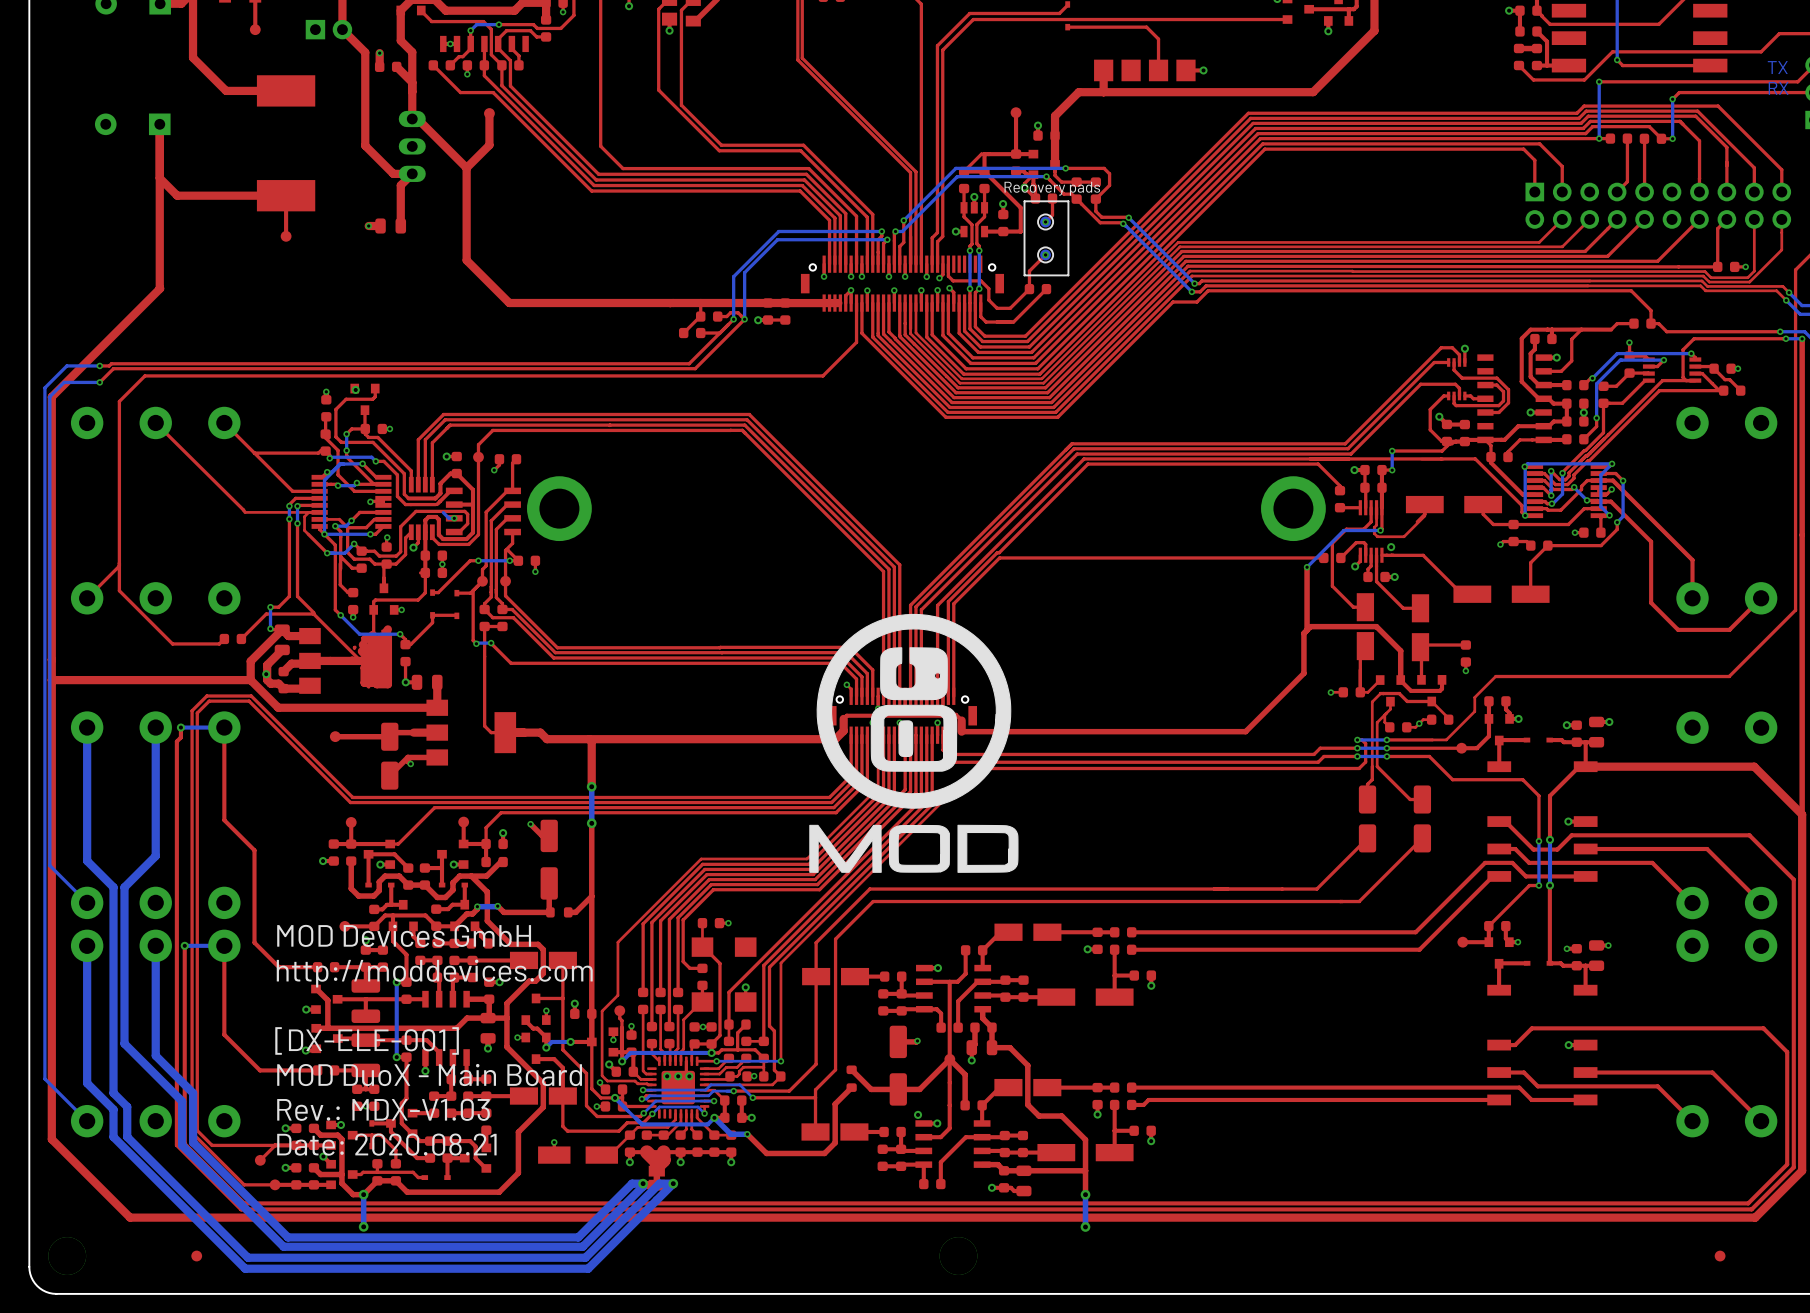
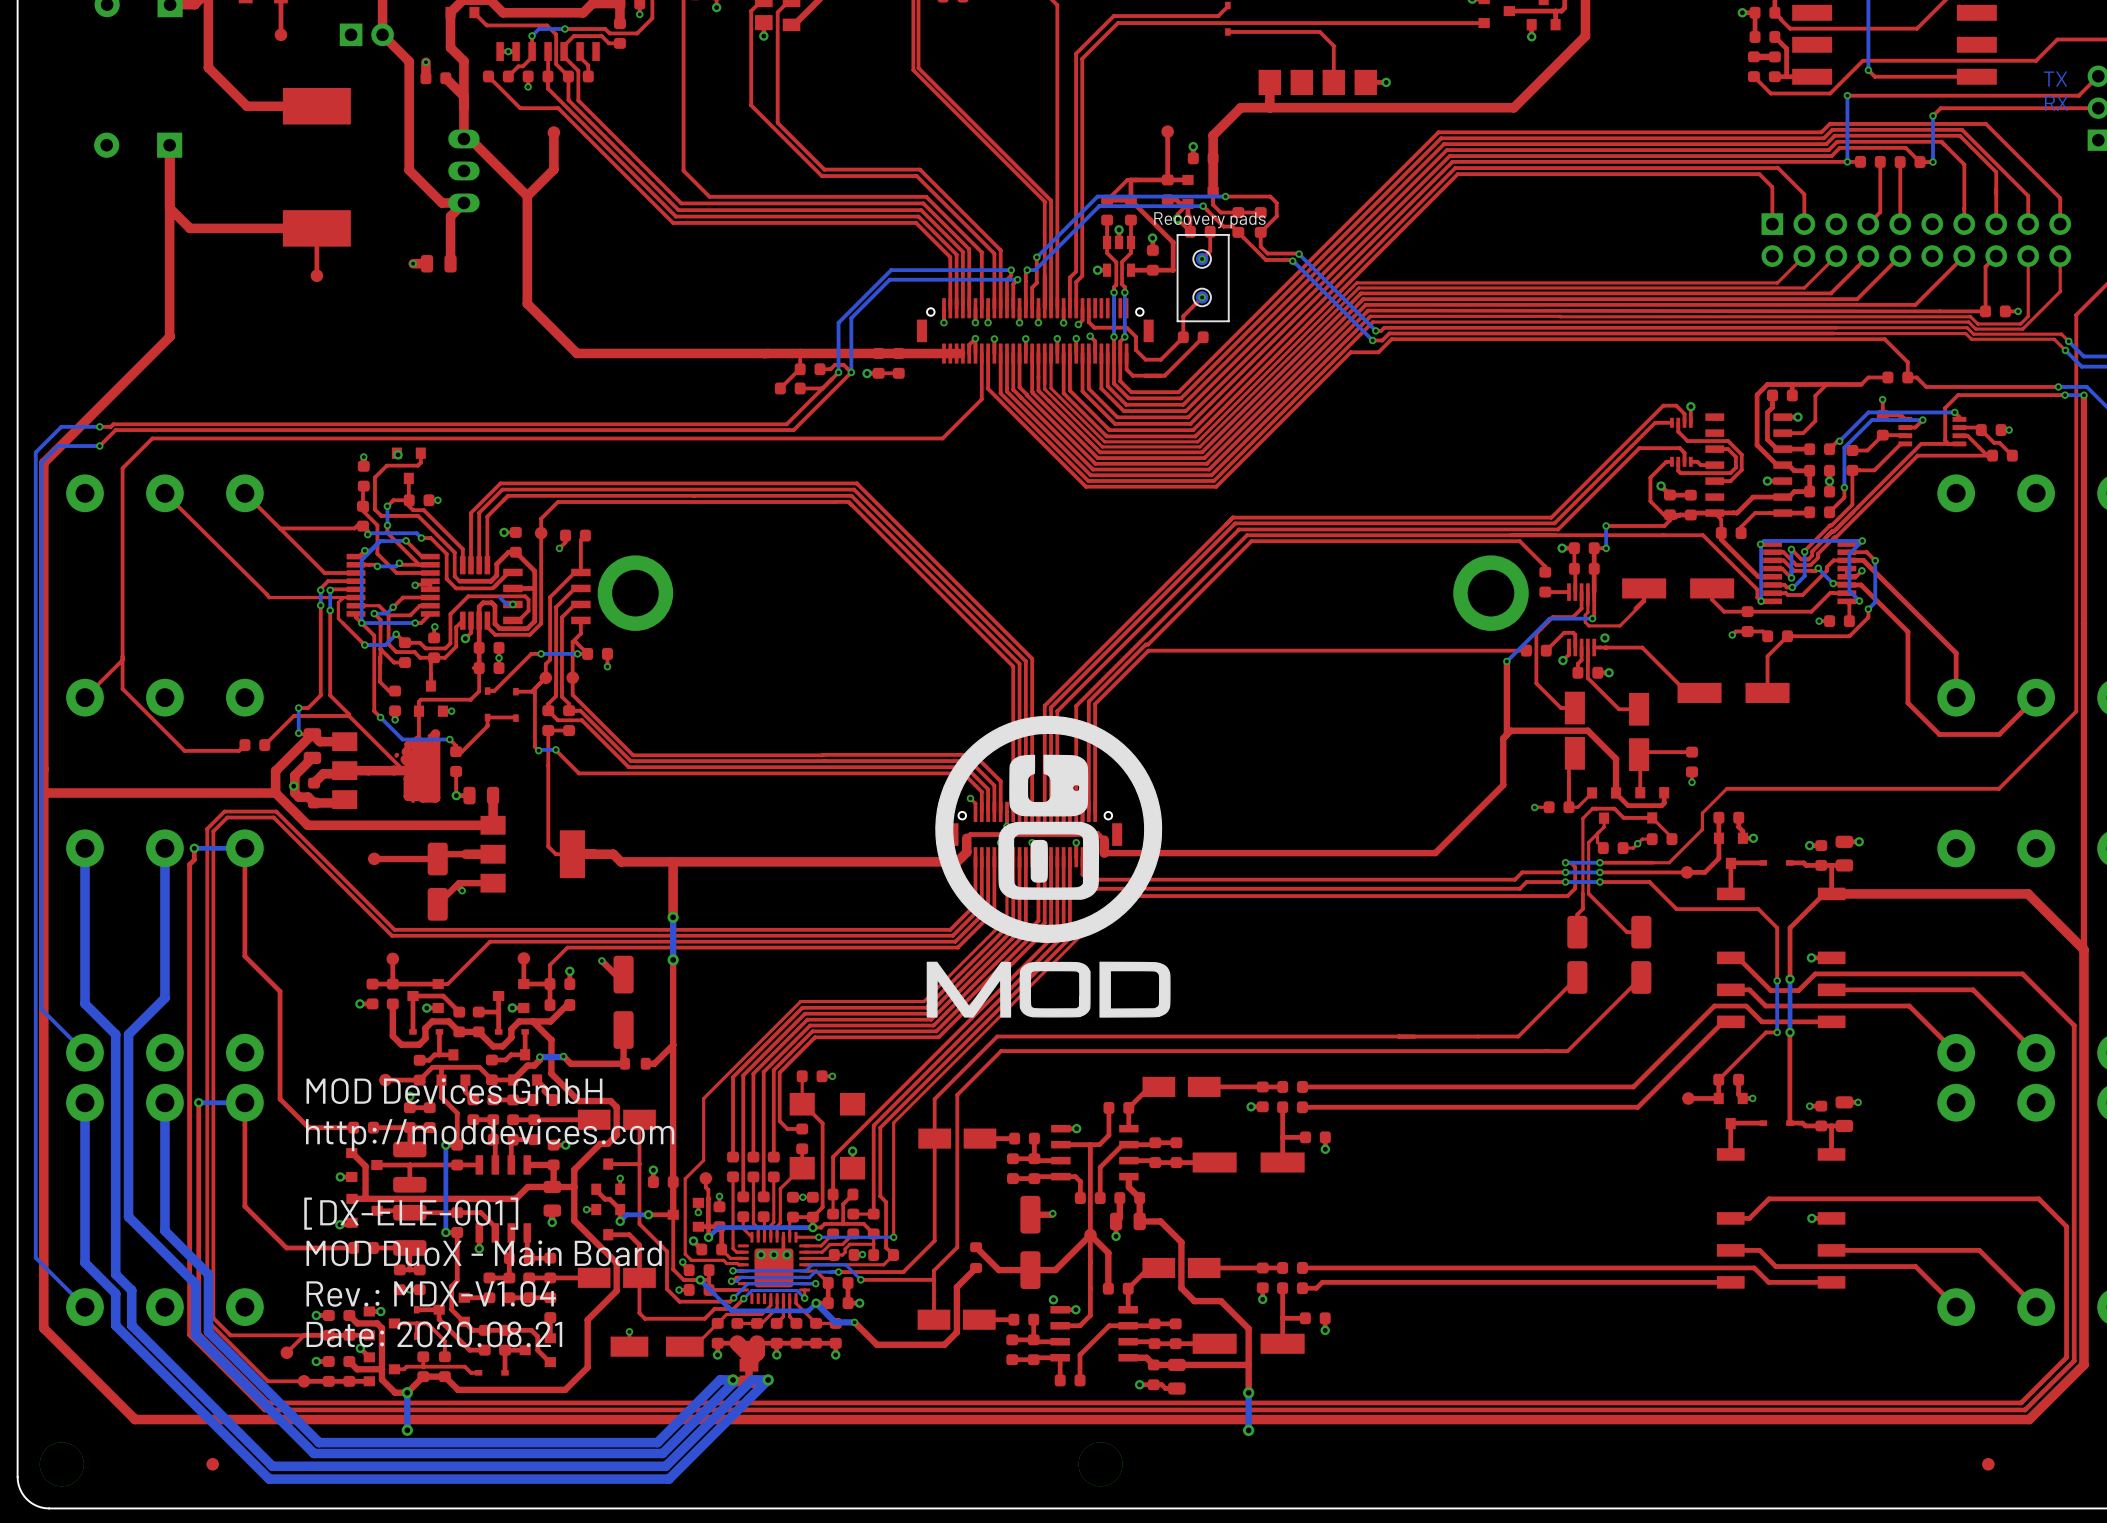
text: Rev.: MDX-V1.03 (383, 1109) -> Rev.: MDX-V1.04 (431, 1293)

